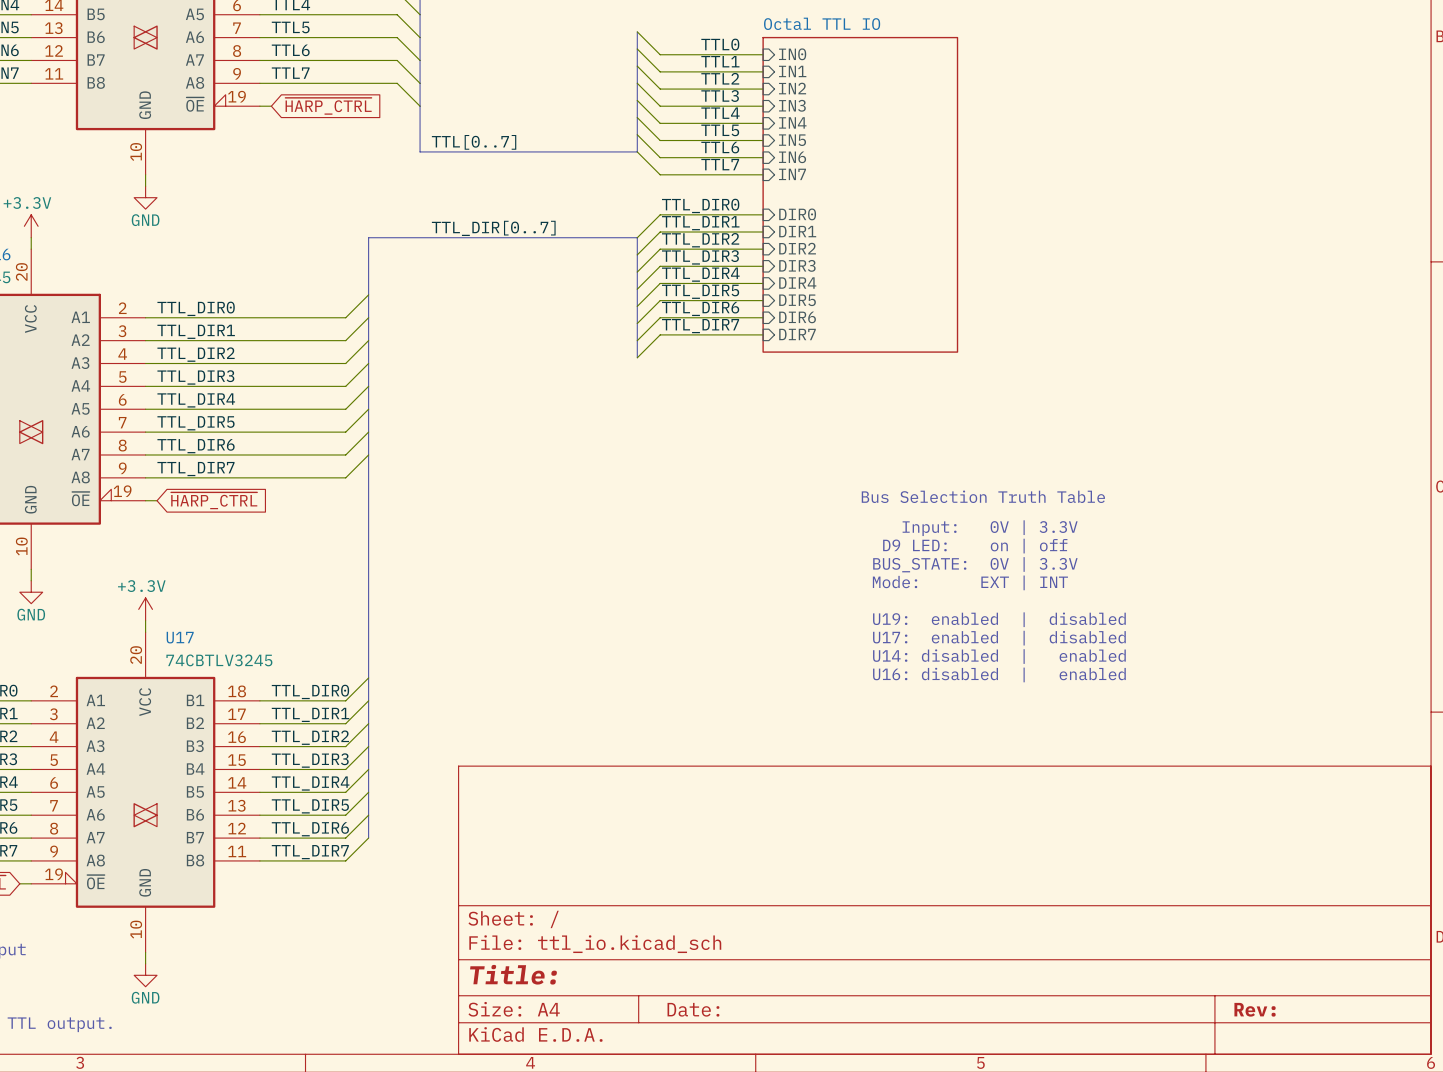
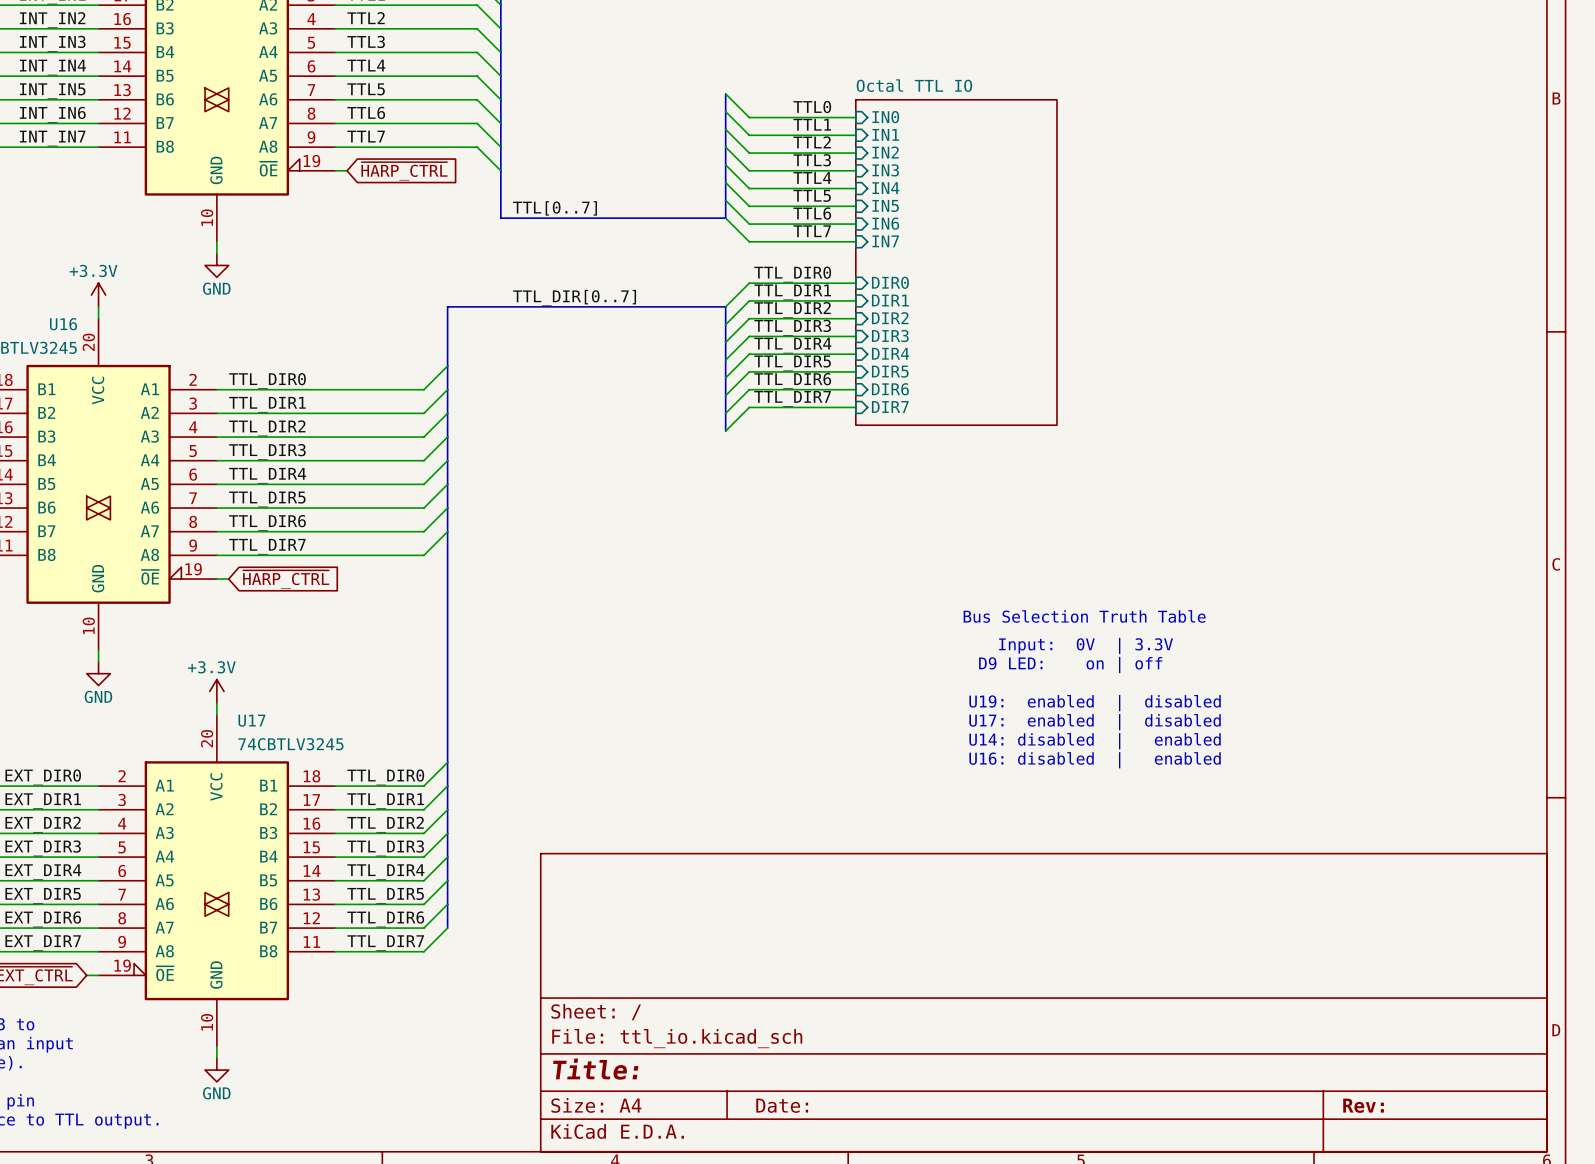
text position: Bus Selection Truth Table (983, 496) -> Bus Selection Truth Table (1084, 616)
text: Input: 0V | 3.3V (990, 528) -> none
text: D9 LED: on | off (975, 546) -> none
text: BUS_STATE: 0V | 3.3V (975, 564) -> Input: 0V | 3.3V (1086, 645)
text: Mode: EXT | INT (970, 582) -> D9 LED: on | off (1070, 665)

